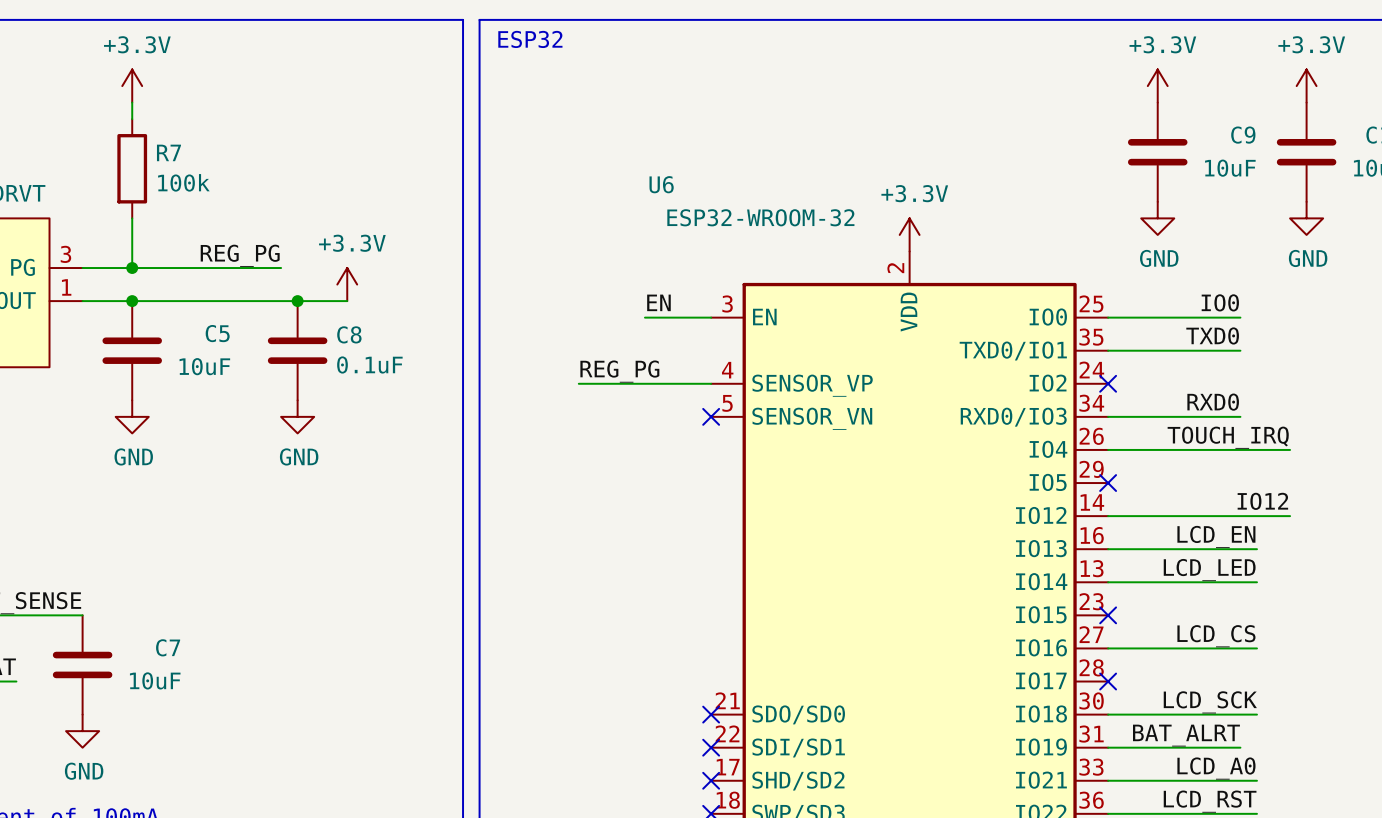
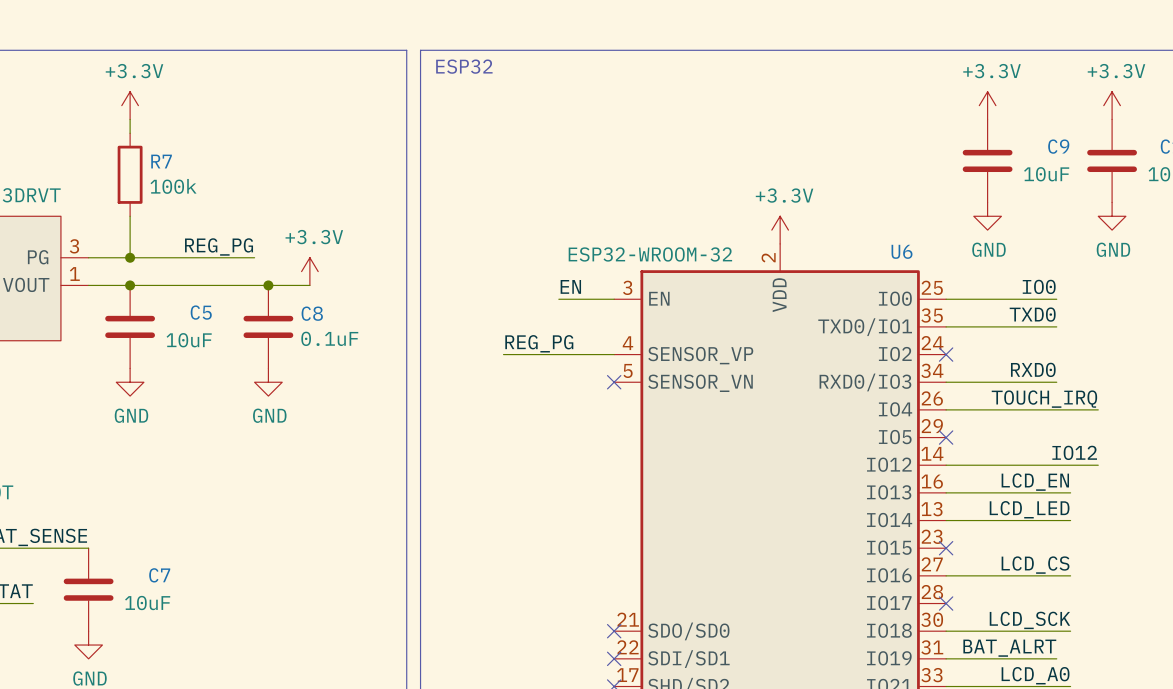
U6 name position: U6 (661, 184) -> U6 (902, 251)
U6 value position: ESP32-WROOM-32 (760, 217) -> ESP32-WROOM-32 (650, 254)

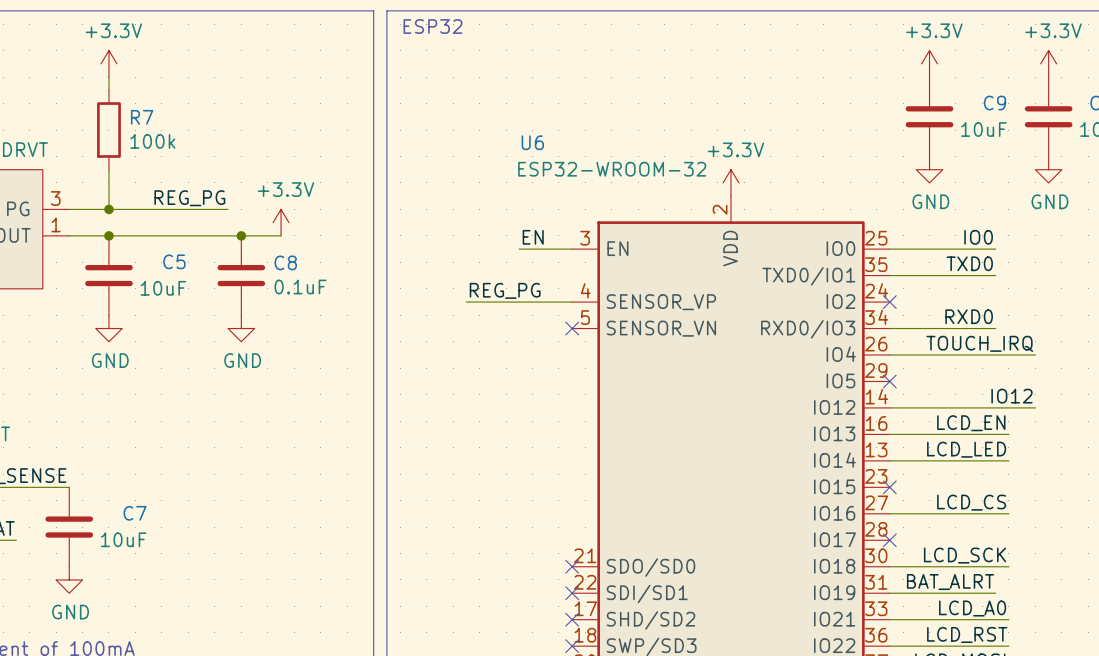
U6 name position: U6 (902, 251) -> U6 (532, 142)
U6 value position: ESP32-WROOM-32 (650, 254) -> ESP32-WROOM-32 (612, 169)

